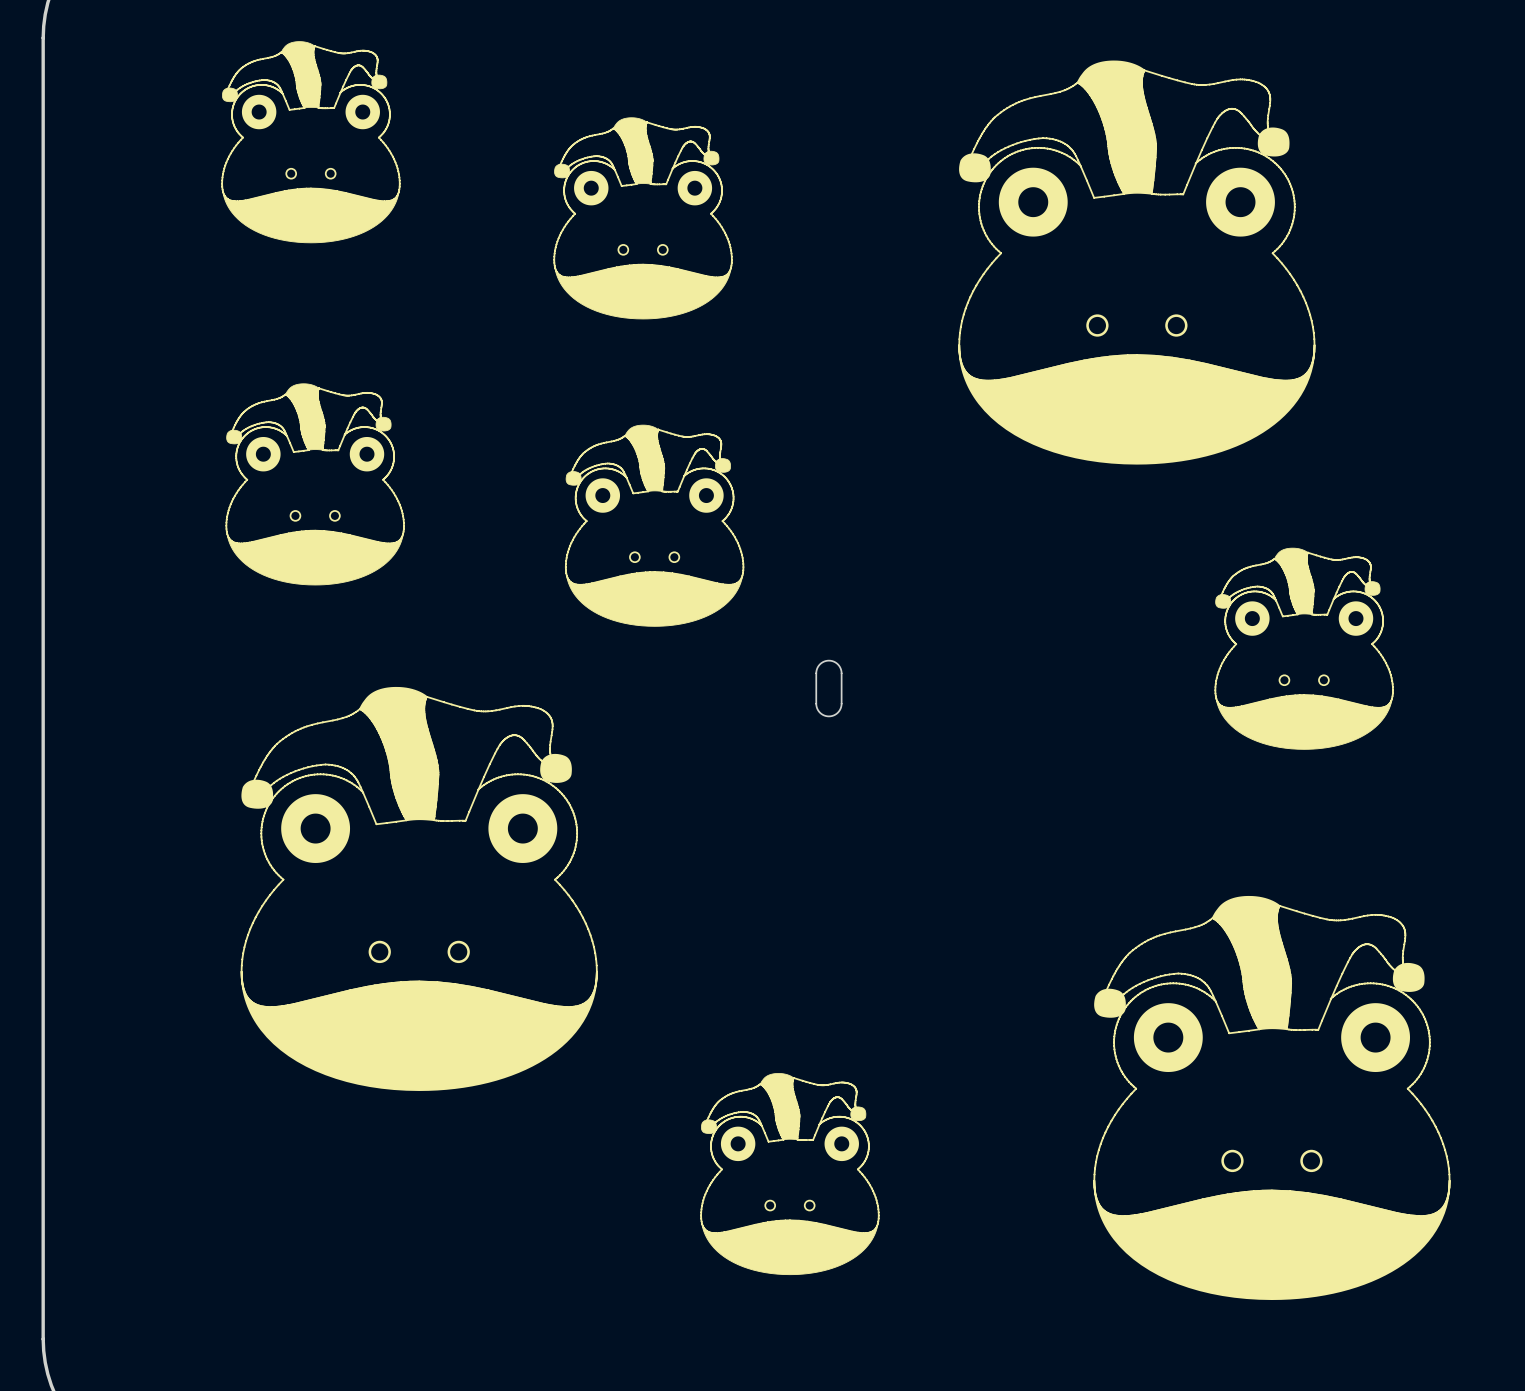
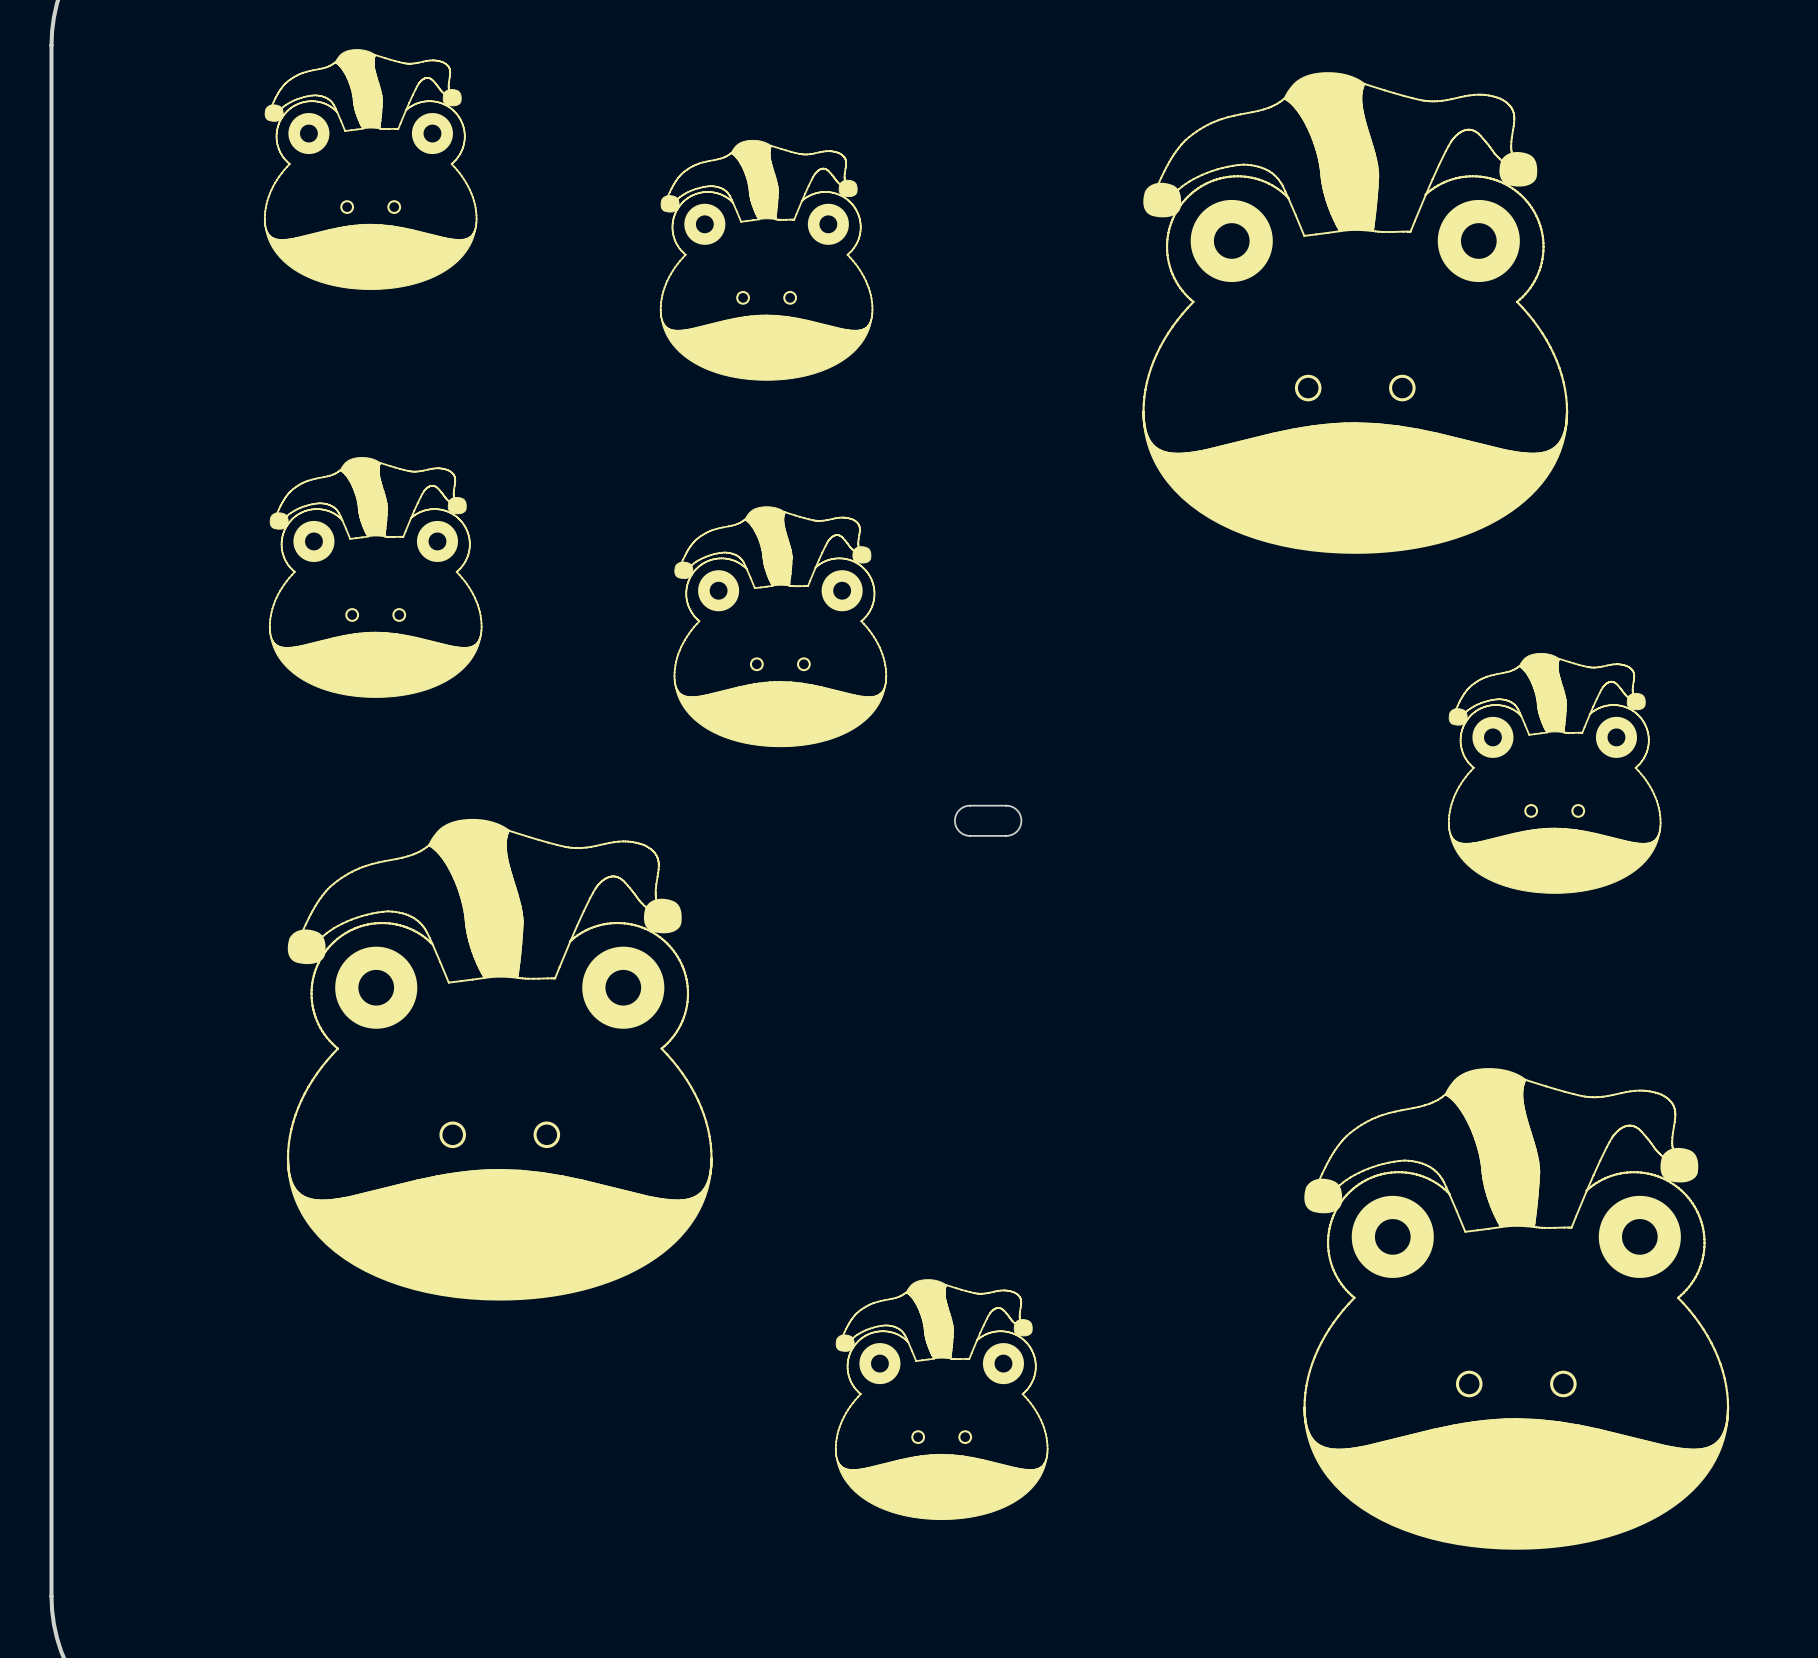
part rotation: 0° (828, 688) -> 90° clockwise (988, 820)

